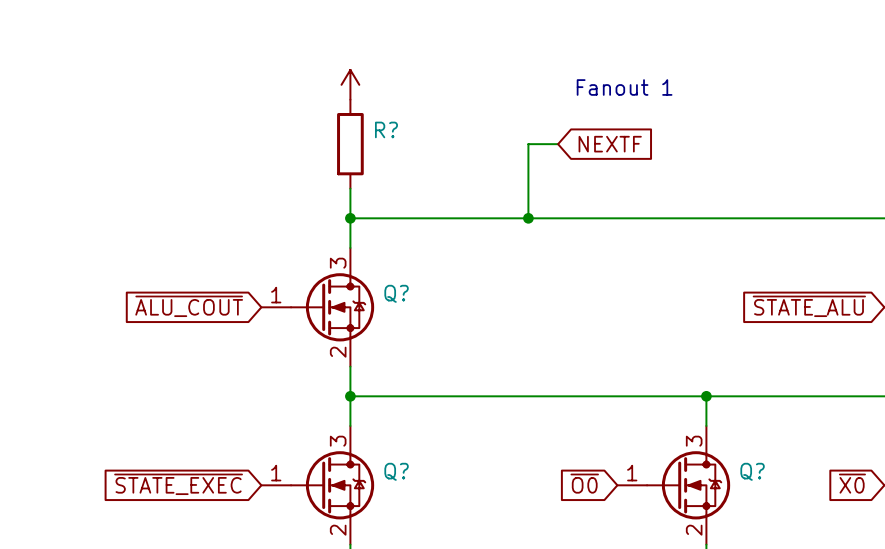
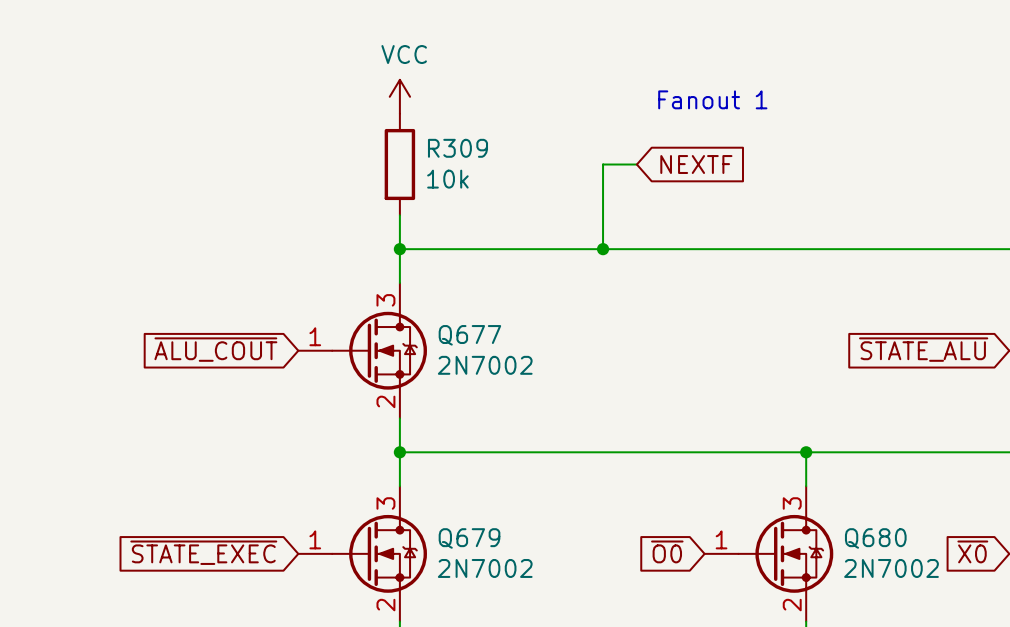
power symbol text: none -> VCC (404, 54)
R? name: R? (386, 129) -> R309 (457, 148)
R? value: none -> 10k (447, 179)
Q? name: Q? (396, 293) -> Q677 (469, 335)
Q? value: none -> 2N7002 (485, 365)
Q? name: Q? (396, 471) -> Q679 (469, 538)
Q? name: Q? (752, 471) -> Q680 (875, 538)
Q? value: none -> 2N7002 (485, 568)
Q? value: none -> 2N7002 (891, 568)

